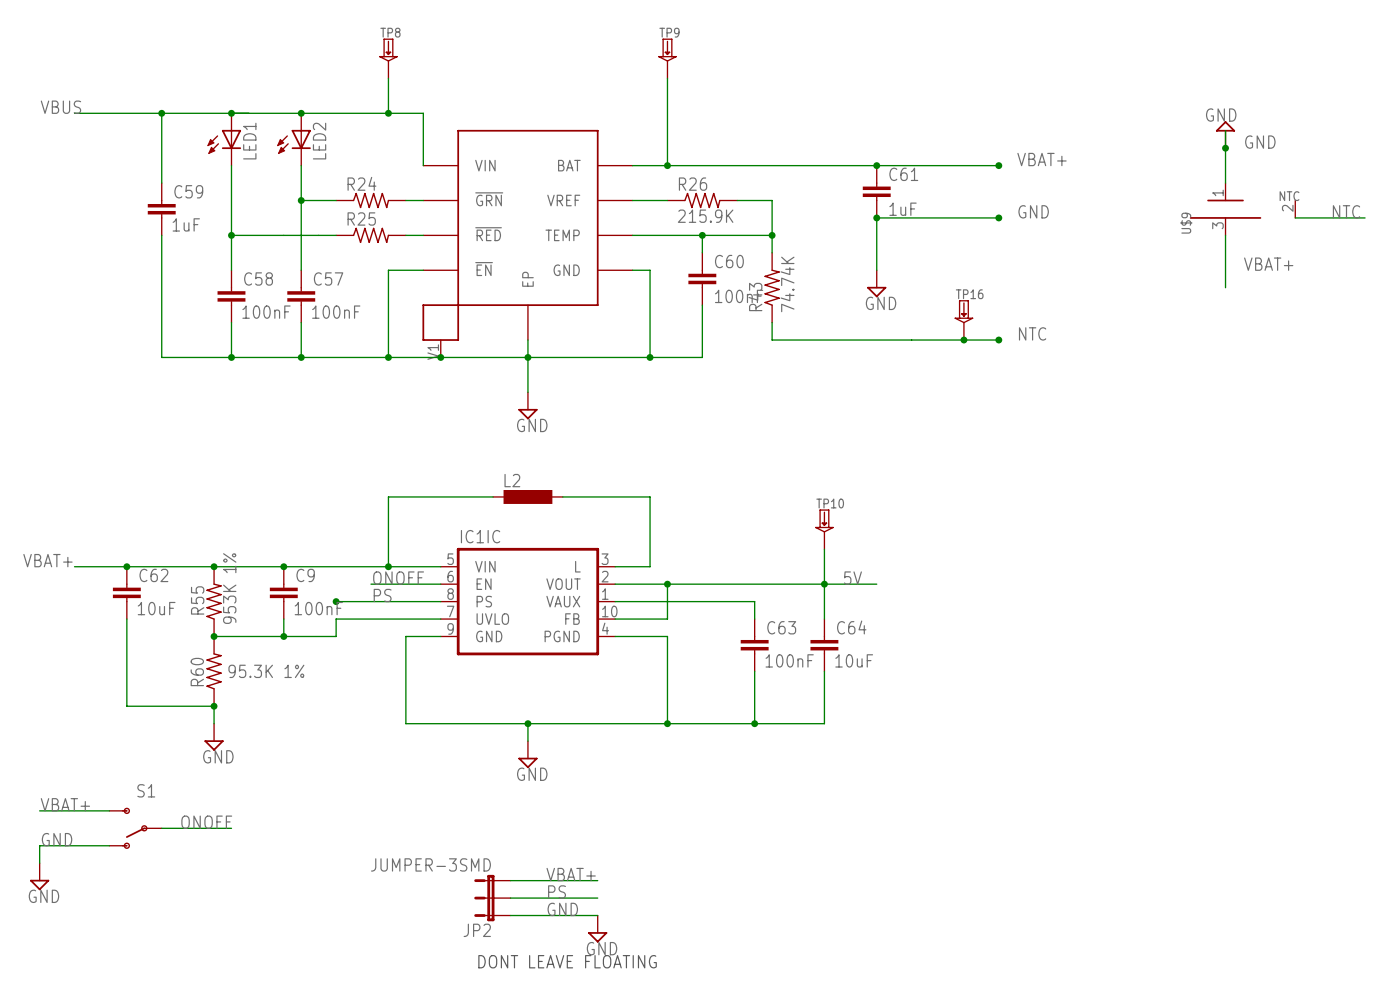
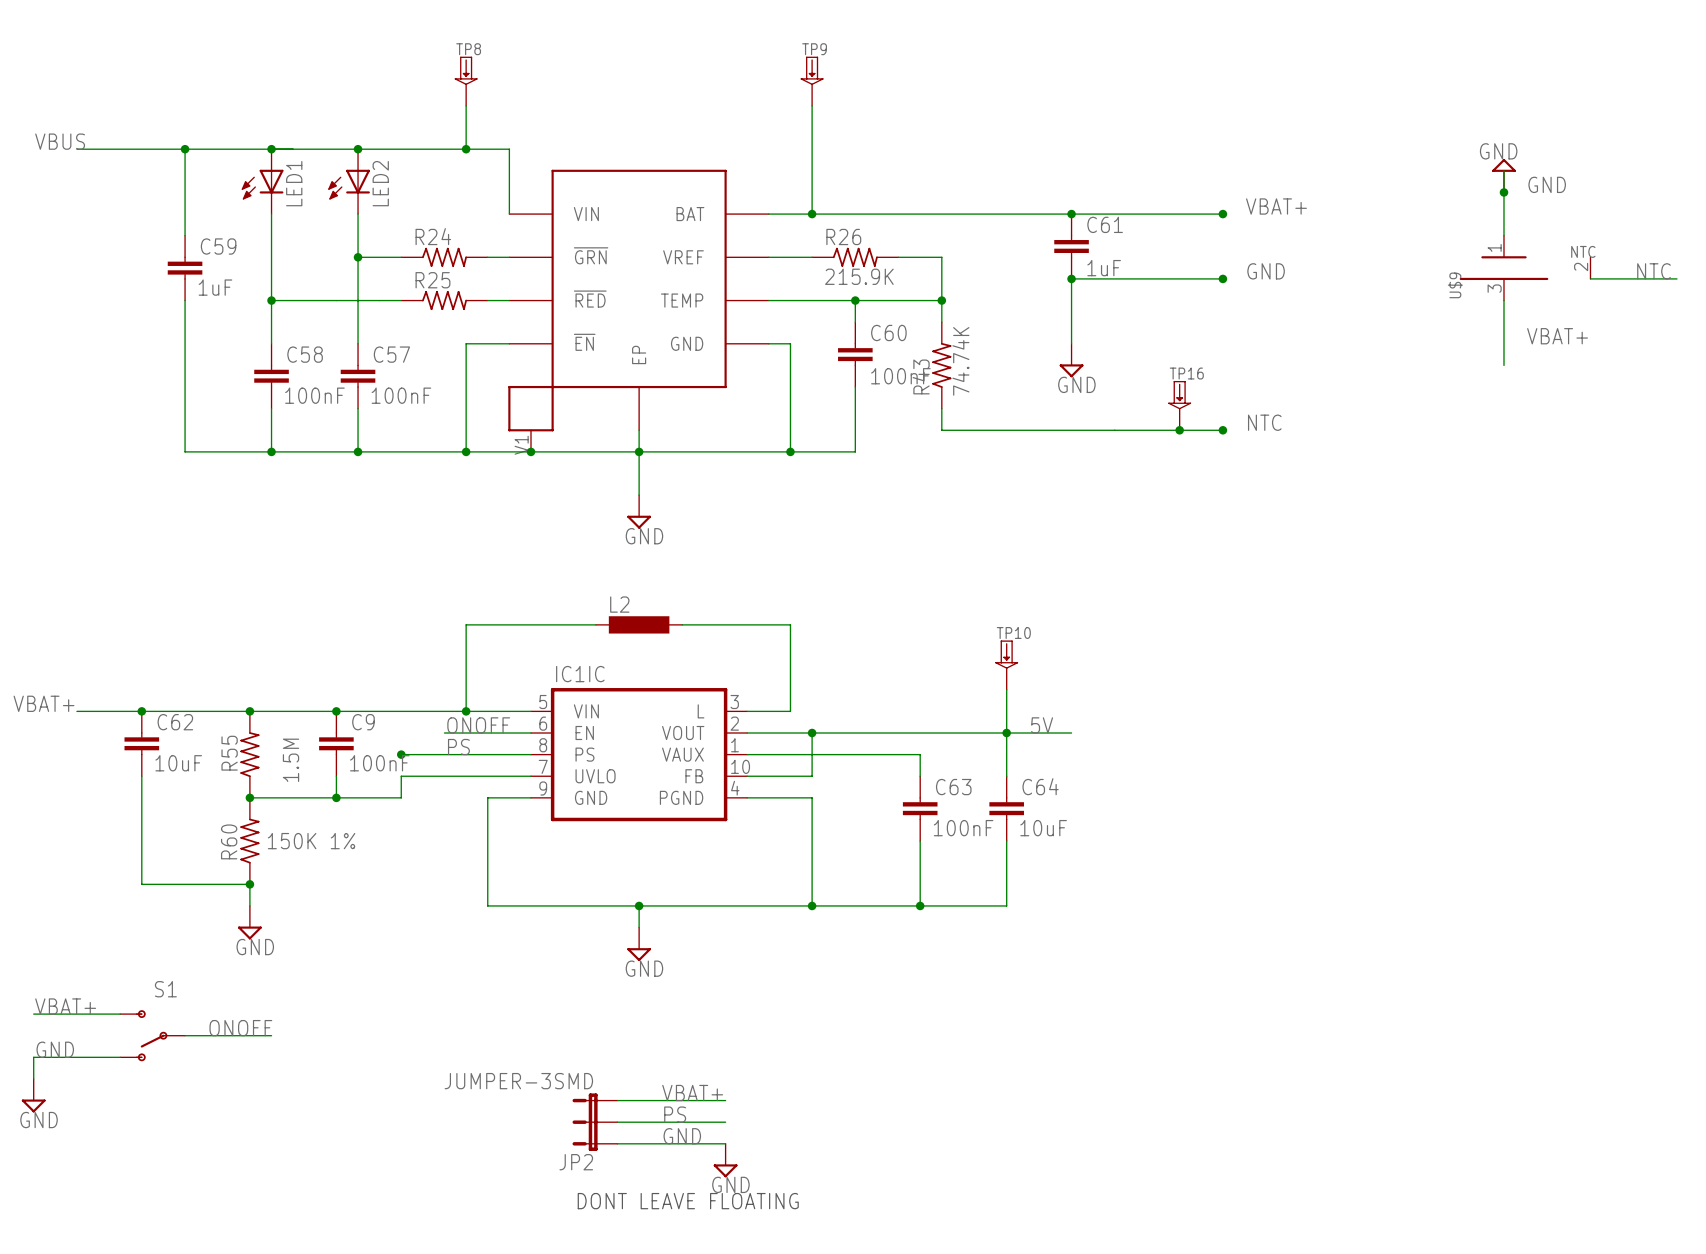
R55 value: 953K 1% (229, 588) -> 1.5M (290, 760)
R60 value: 95.3K 1% (266, 671) -> 150K 1% (311, 841)

